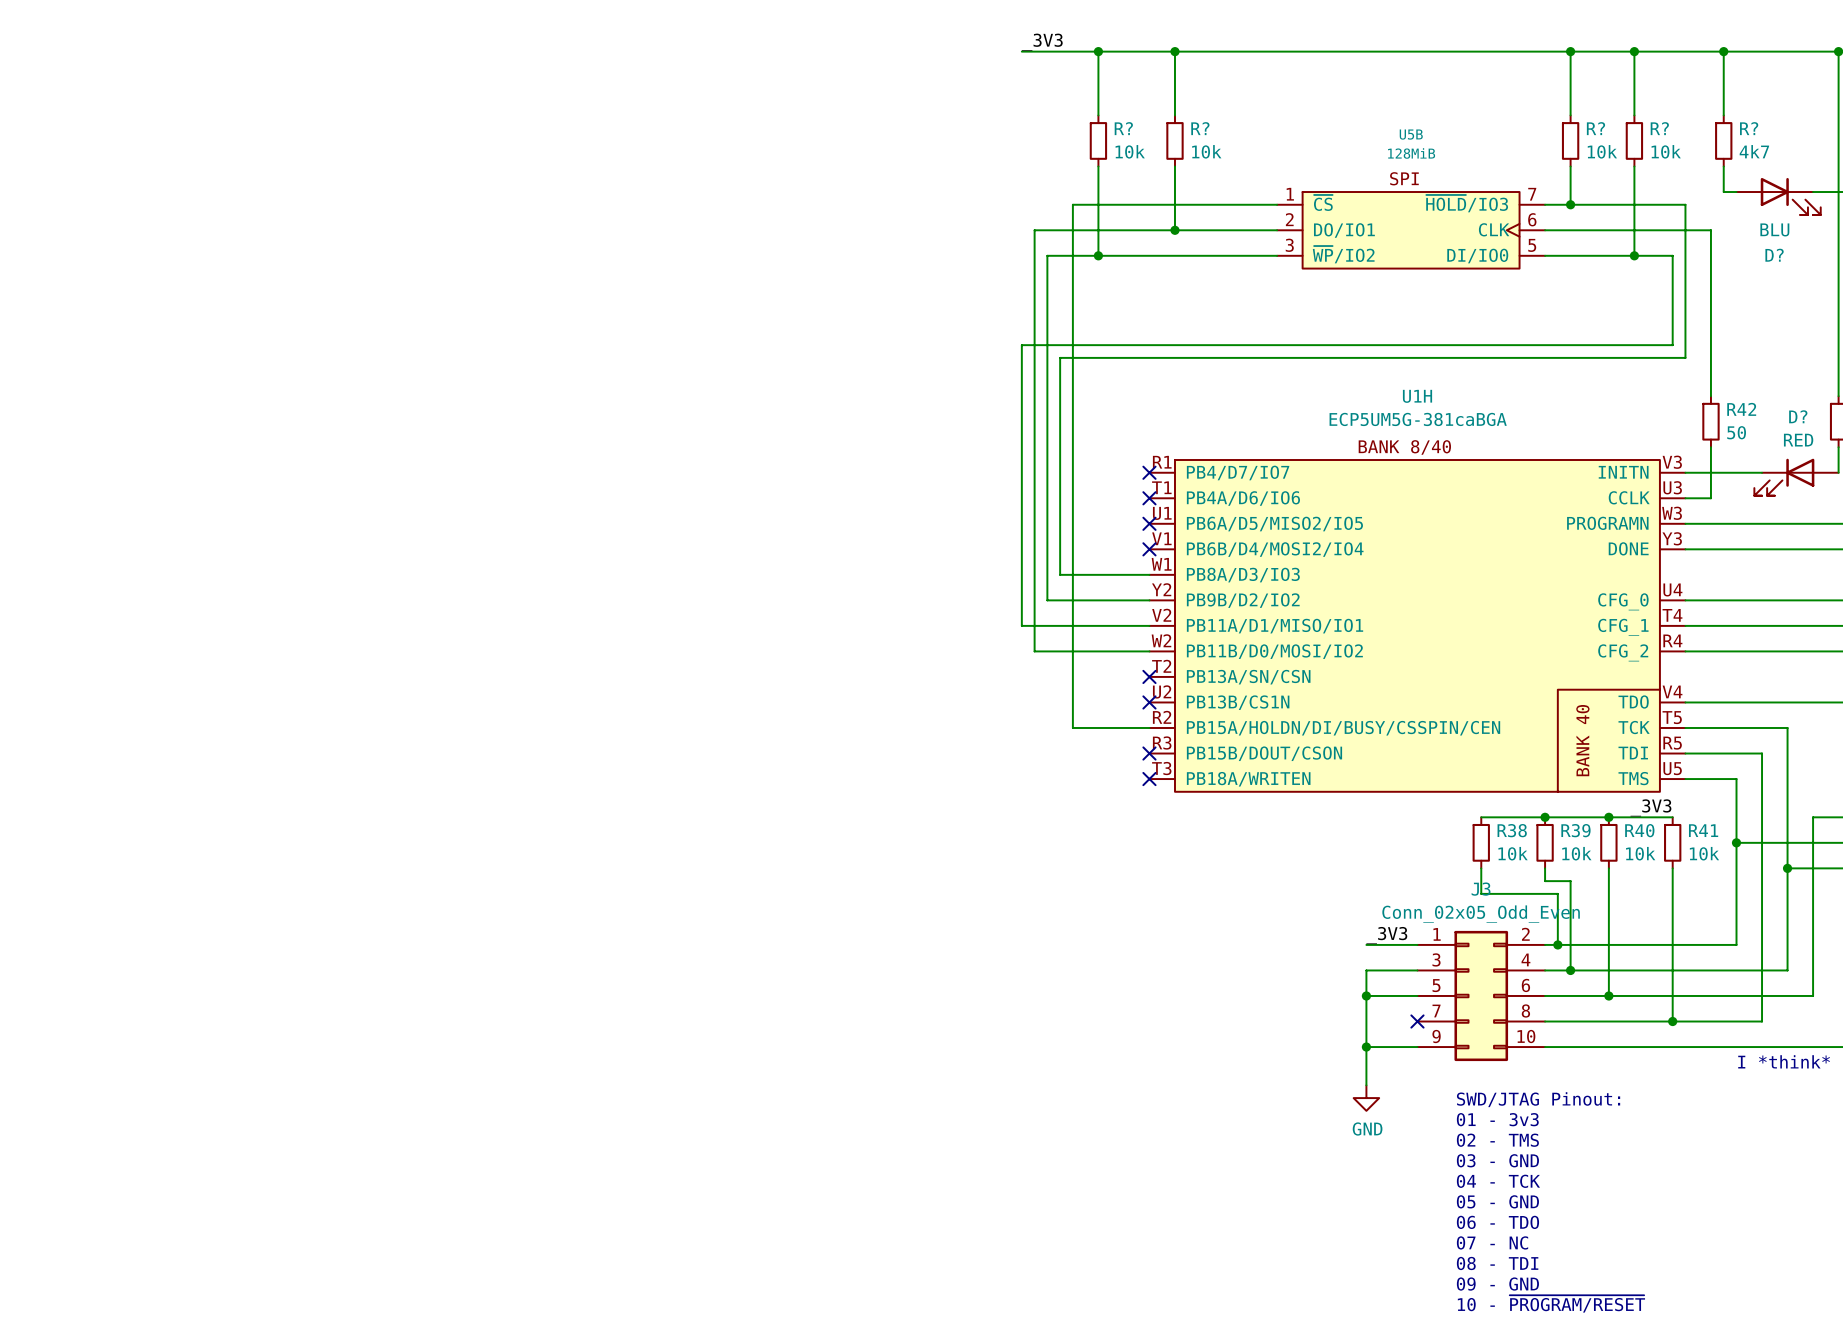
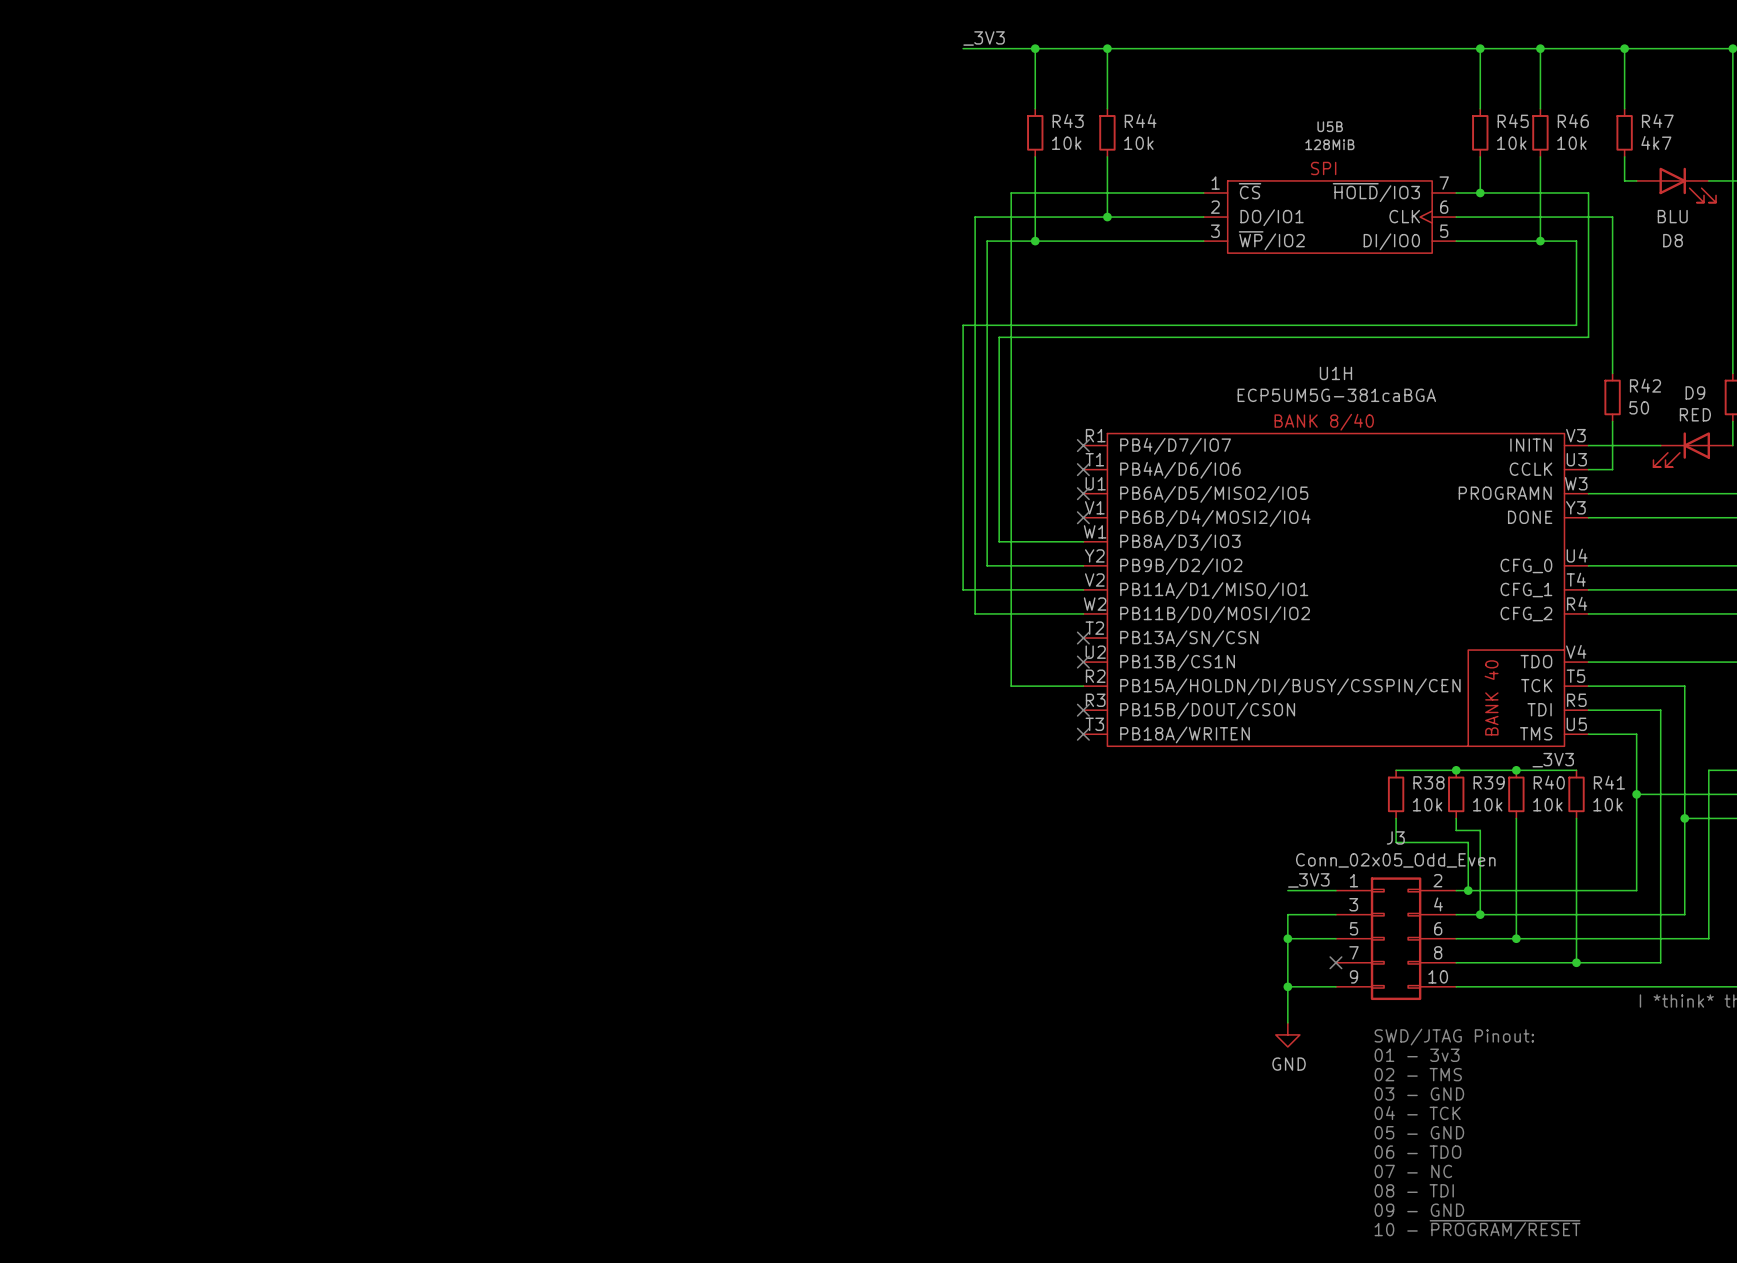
R? name: R? (1123, 128) -> R43 (1068, 121)
R? name: R? (1200, 128) -> R44 (1140, 121)
R? name: R? (1595, 128) -> R45 (1513, 121)
R? name: R? (1659, 128) -> R46 (1573, 121)
R? name: R? (1749, 128) -> R47 (1657, 121)
D? name: D? (1774, 255) -> D8 (1673, 240)
D? name: D? (1798, 416) -> D9 (1695, 392)

